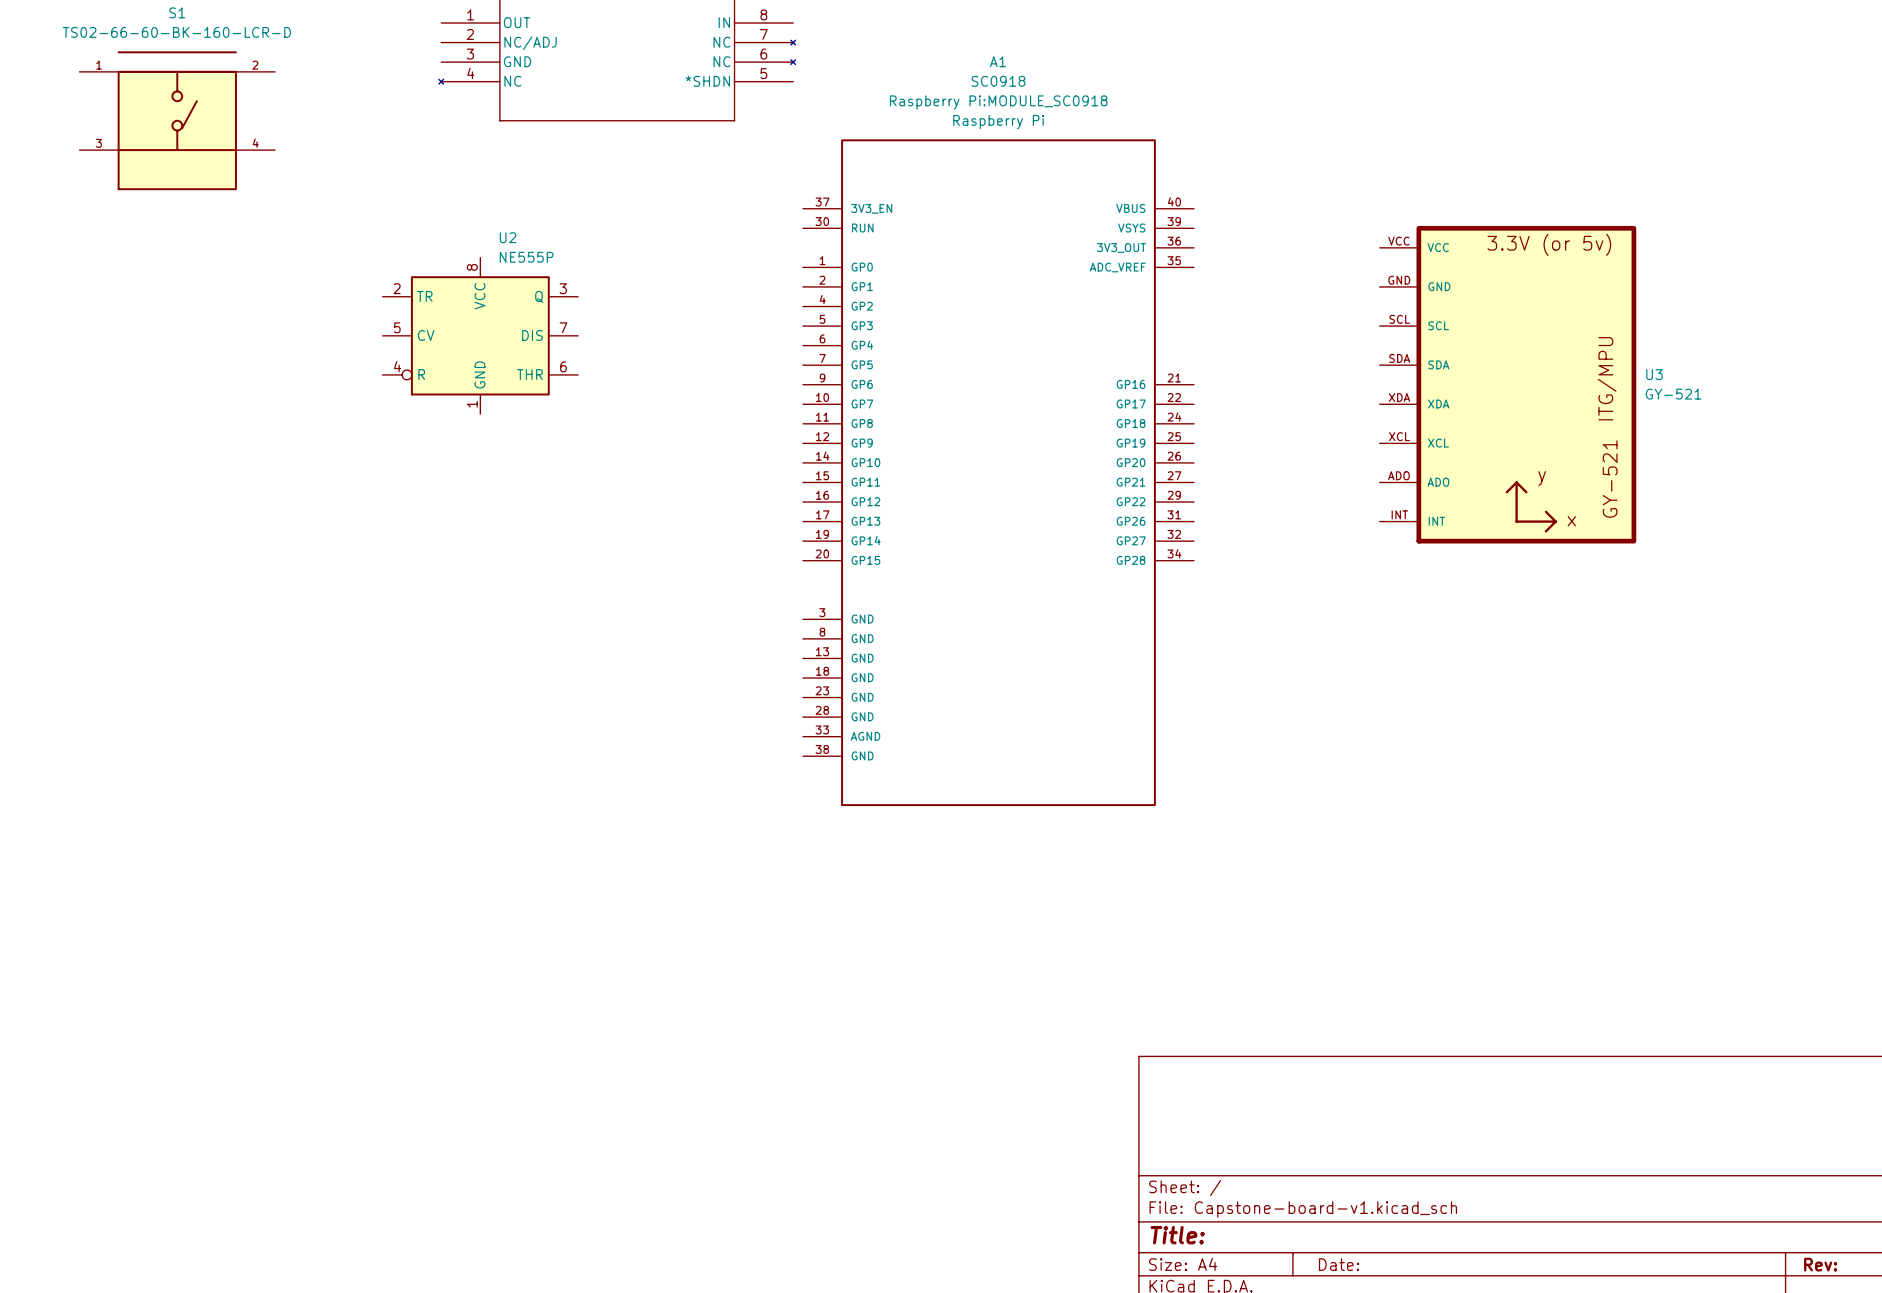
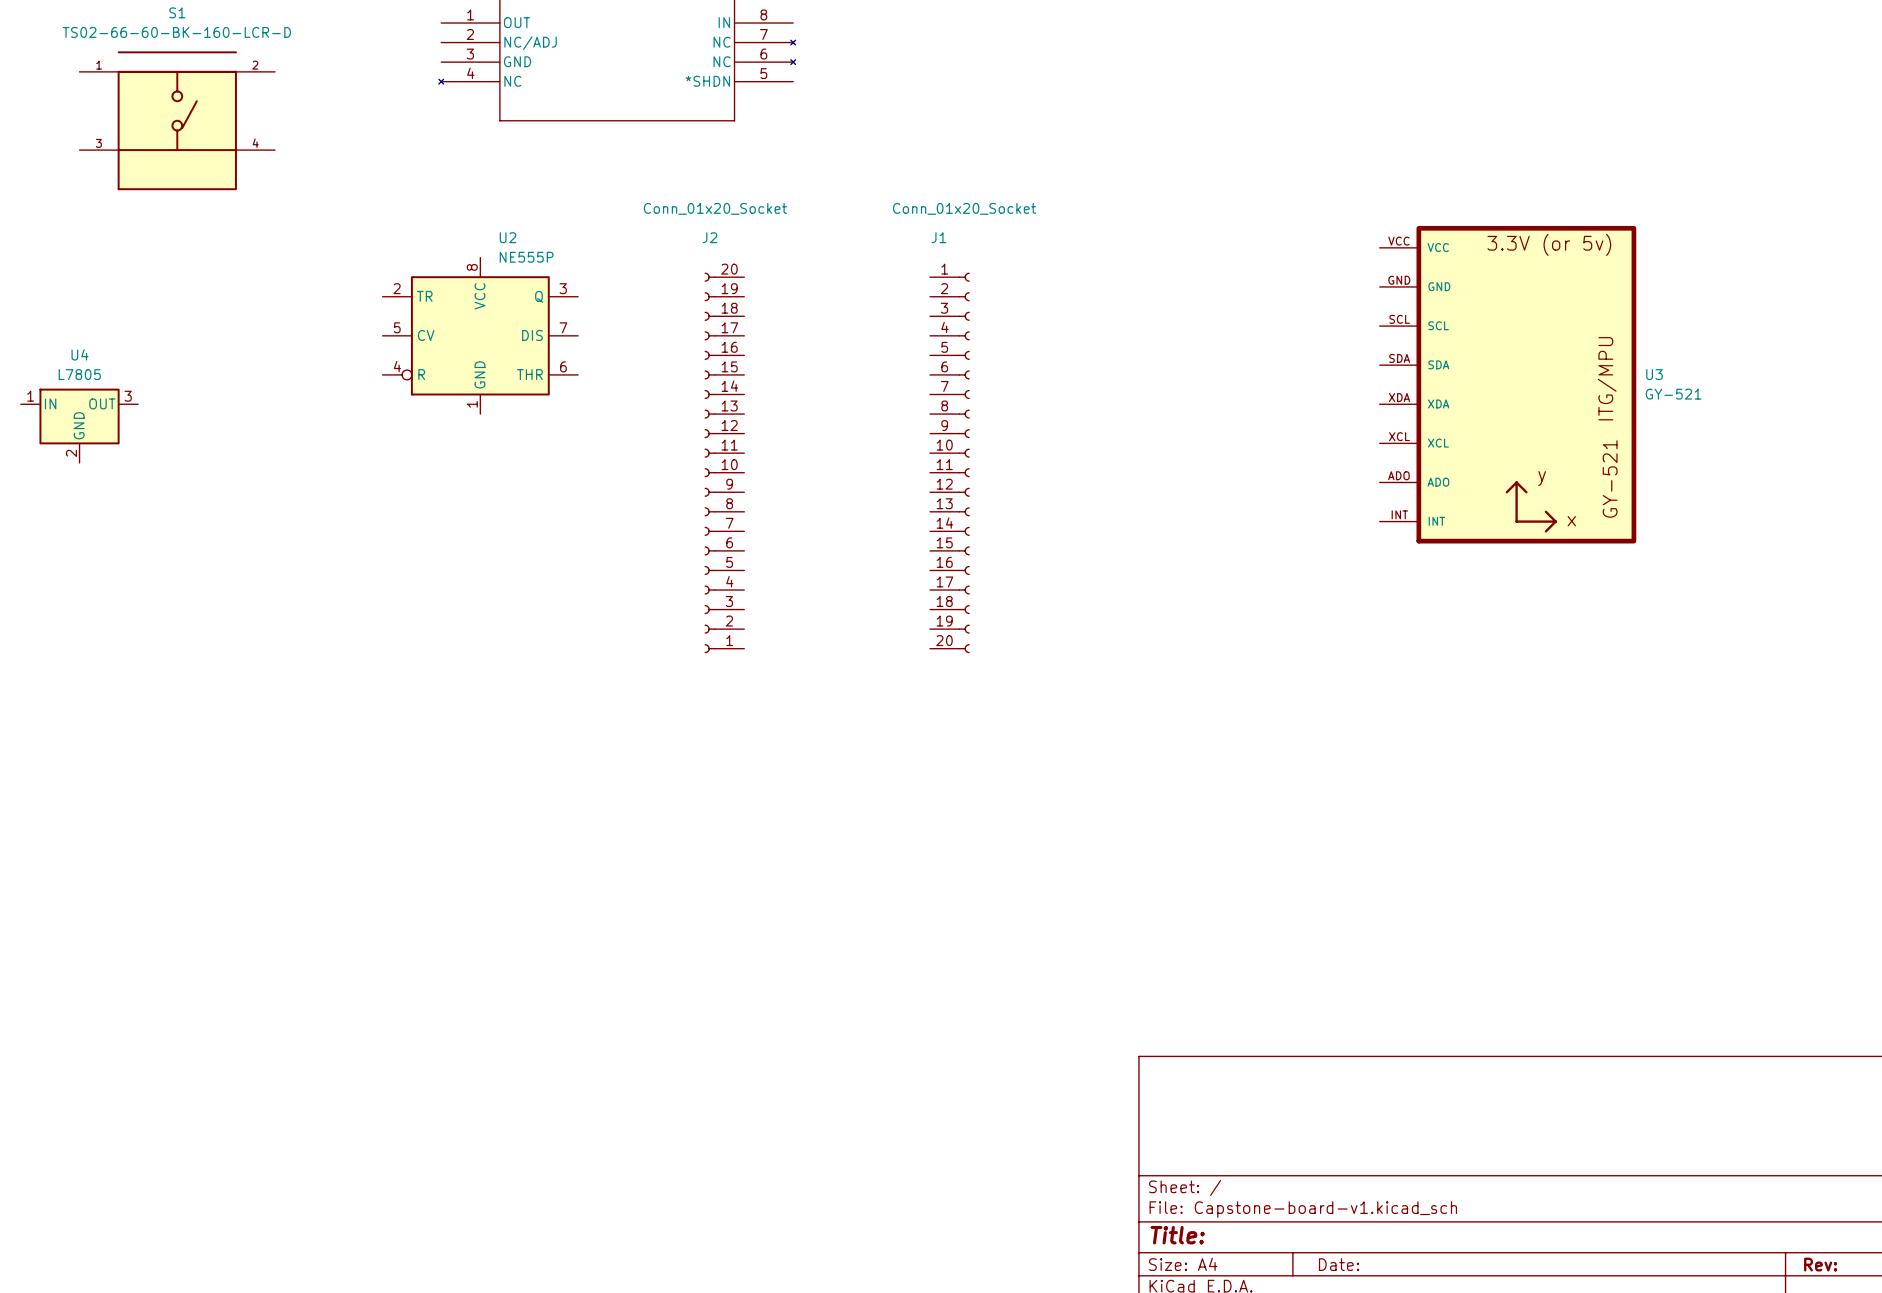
U4: none -> L7805 (79, 425)
J2: none -> Conn_01x20_Socket (724, 462)
J1: none -> Conn_01x20_Socket (949, 462)
A1: SC0918 (998, 472) -> none

